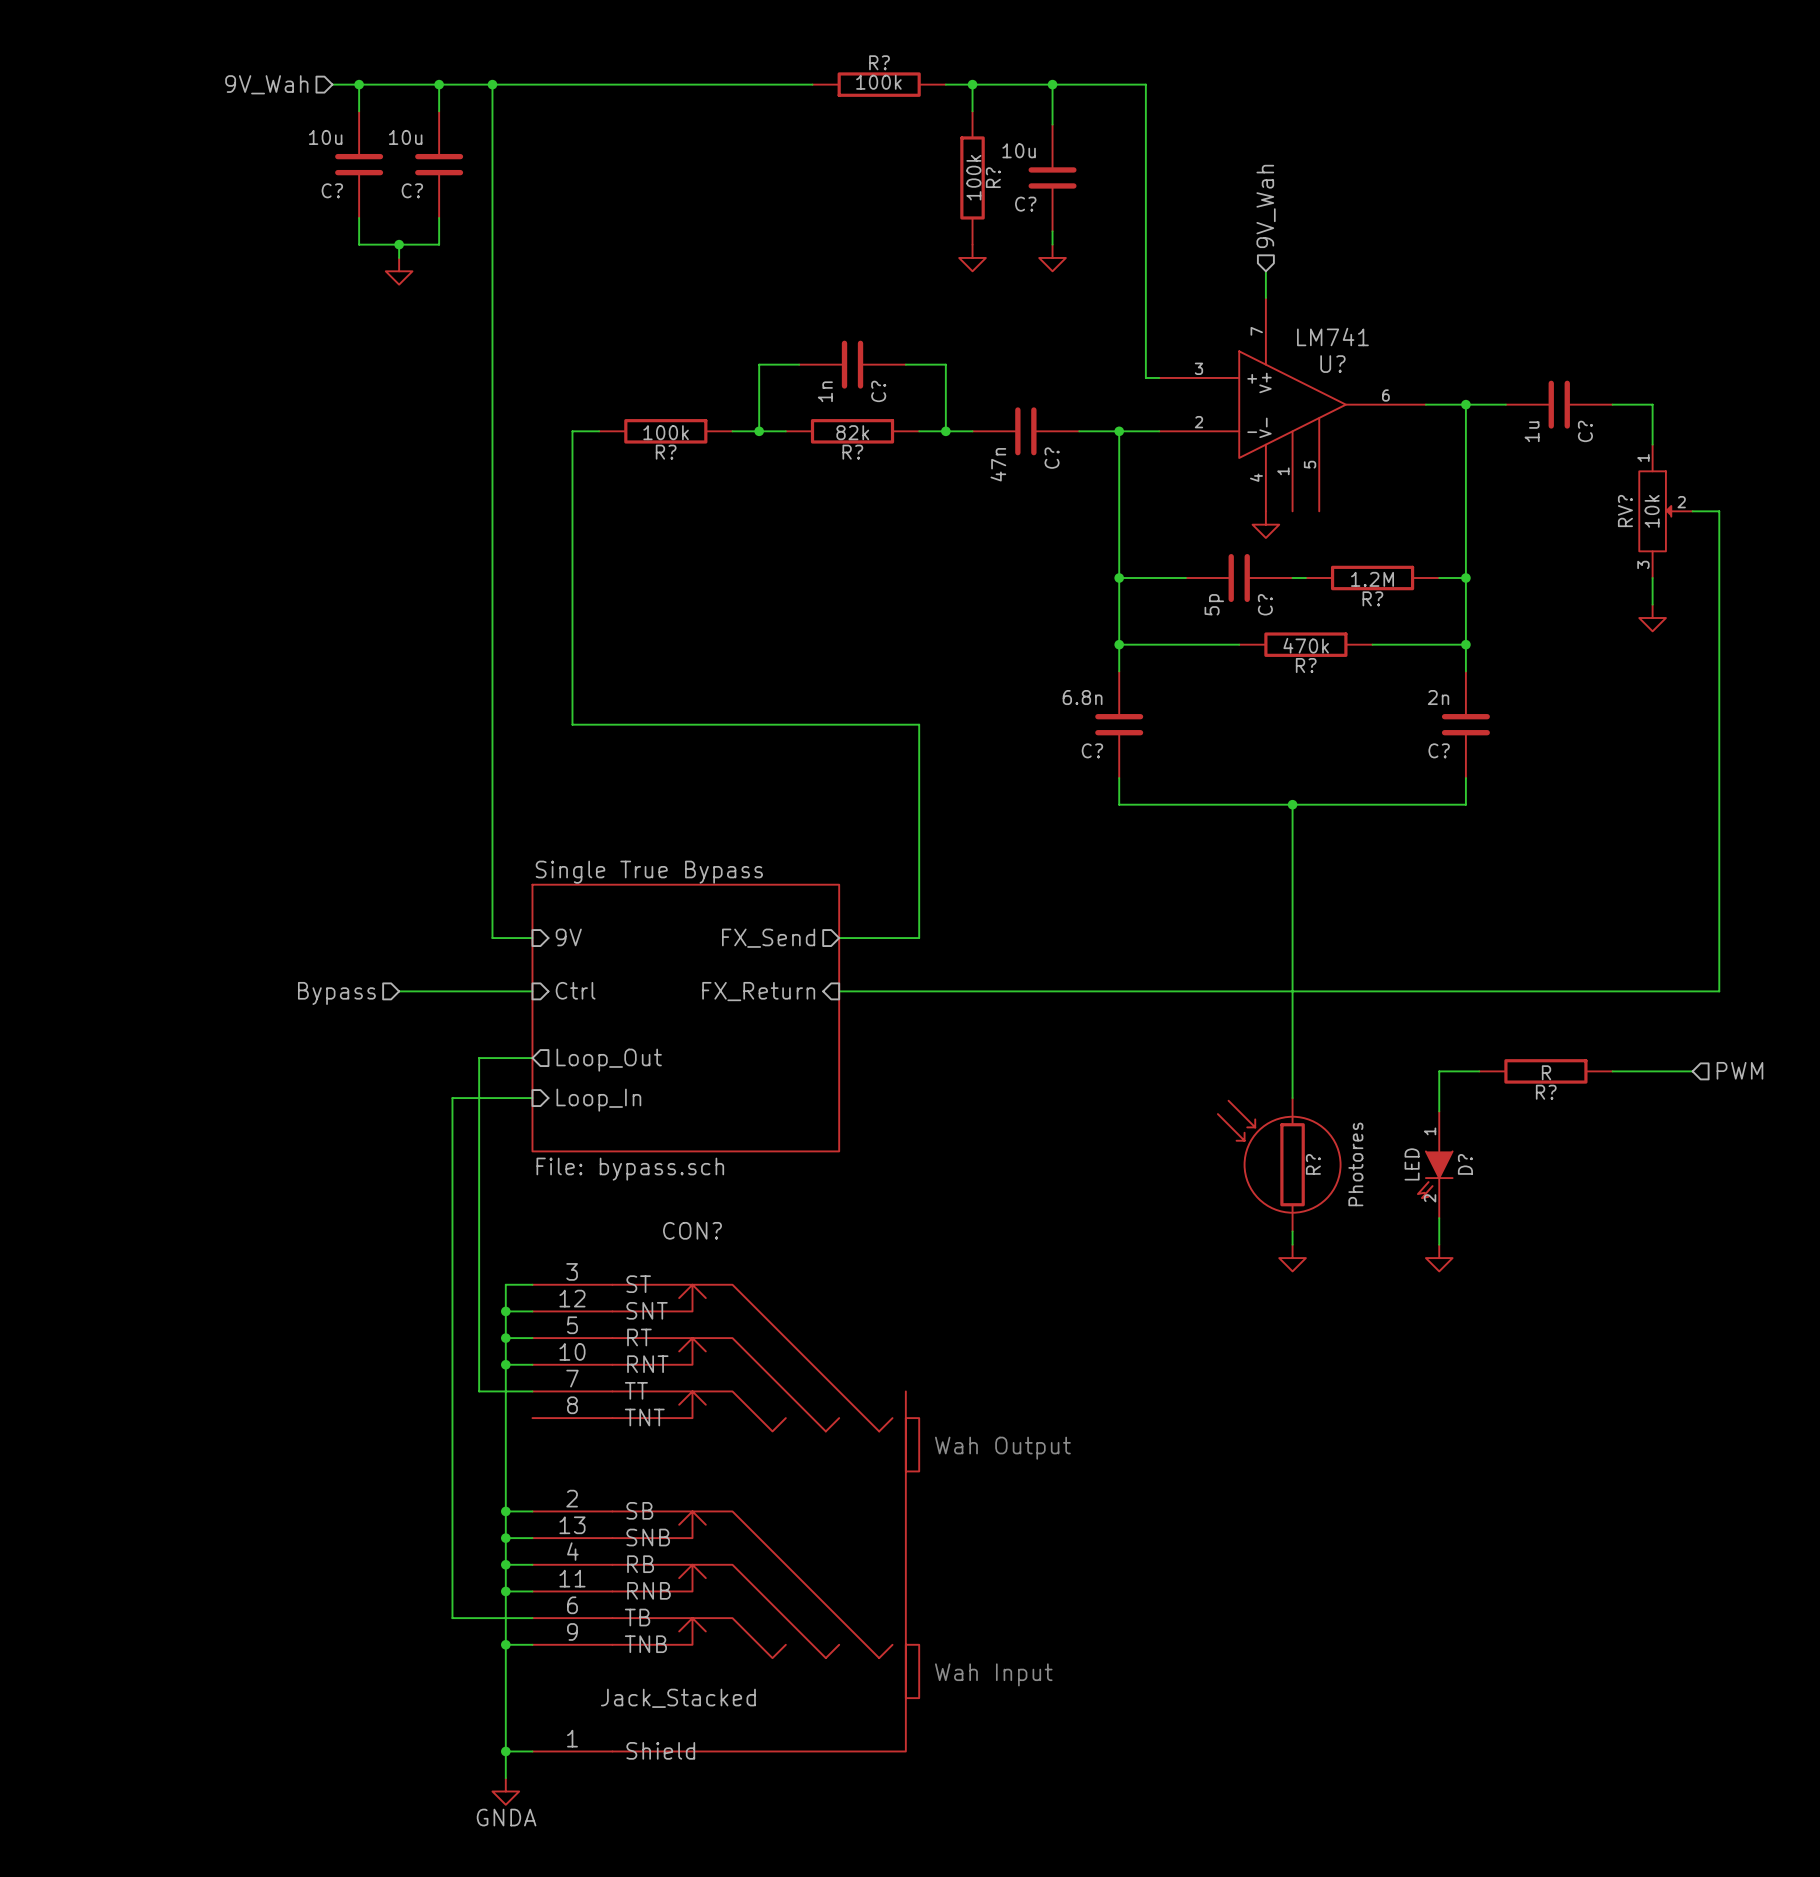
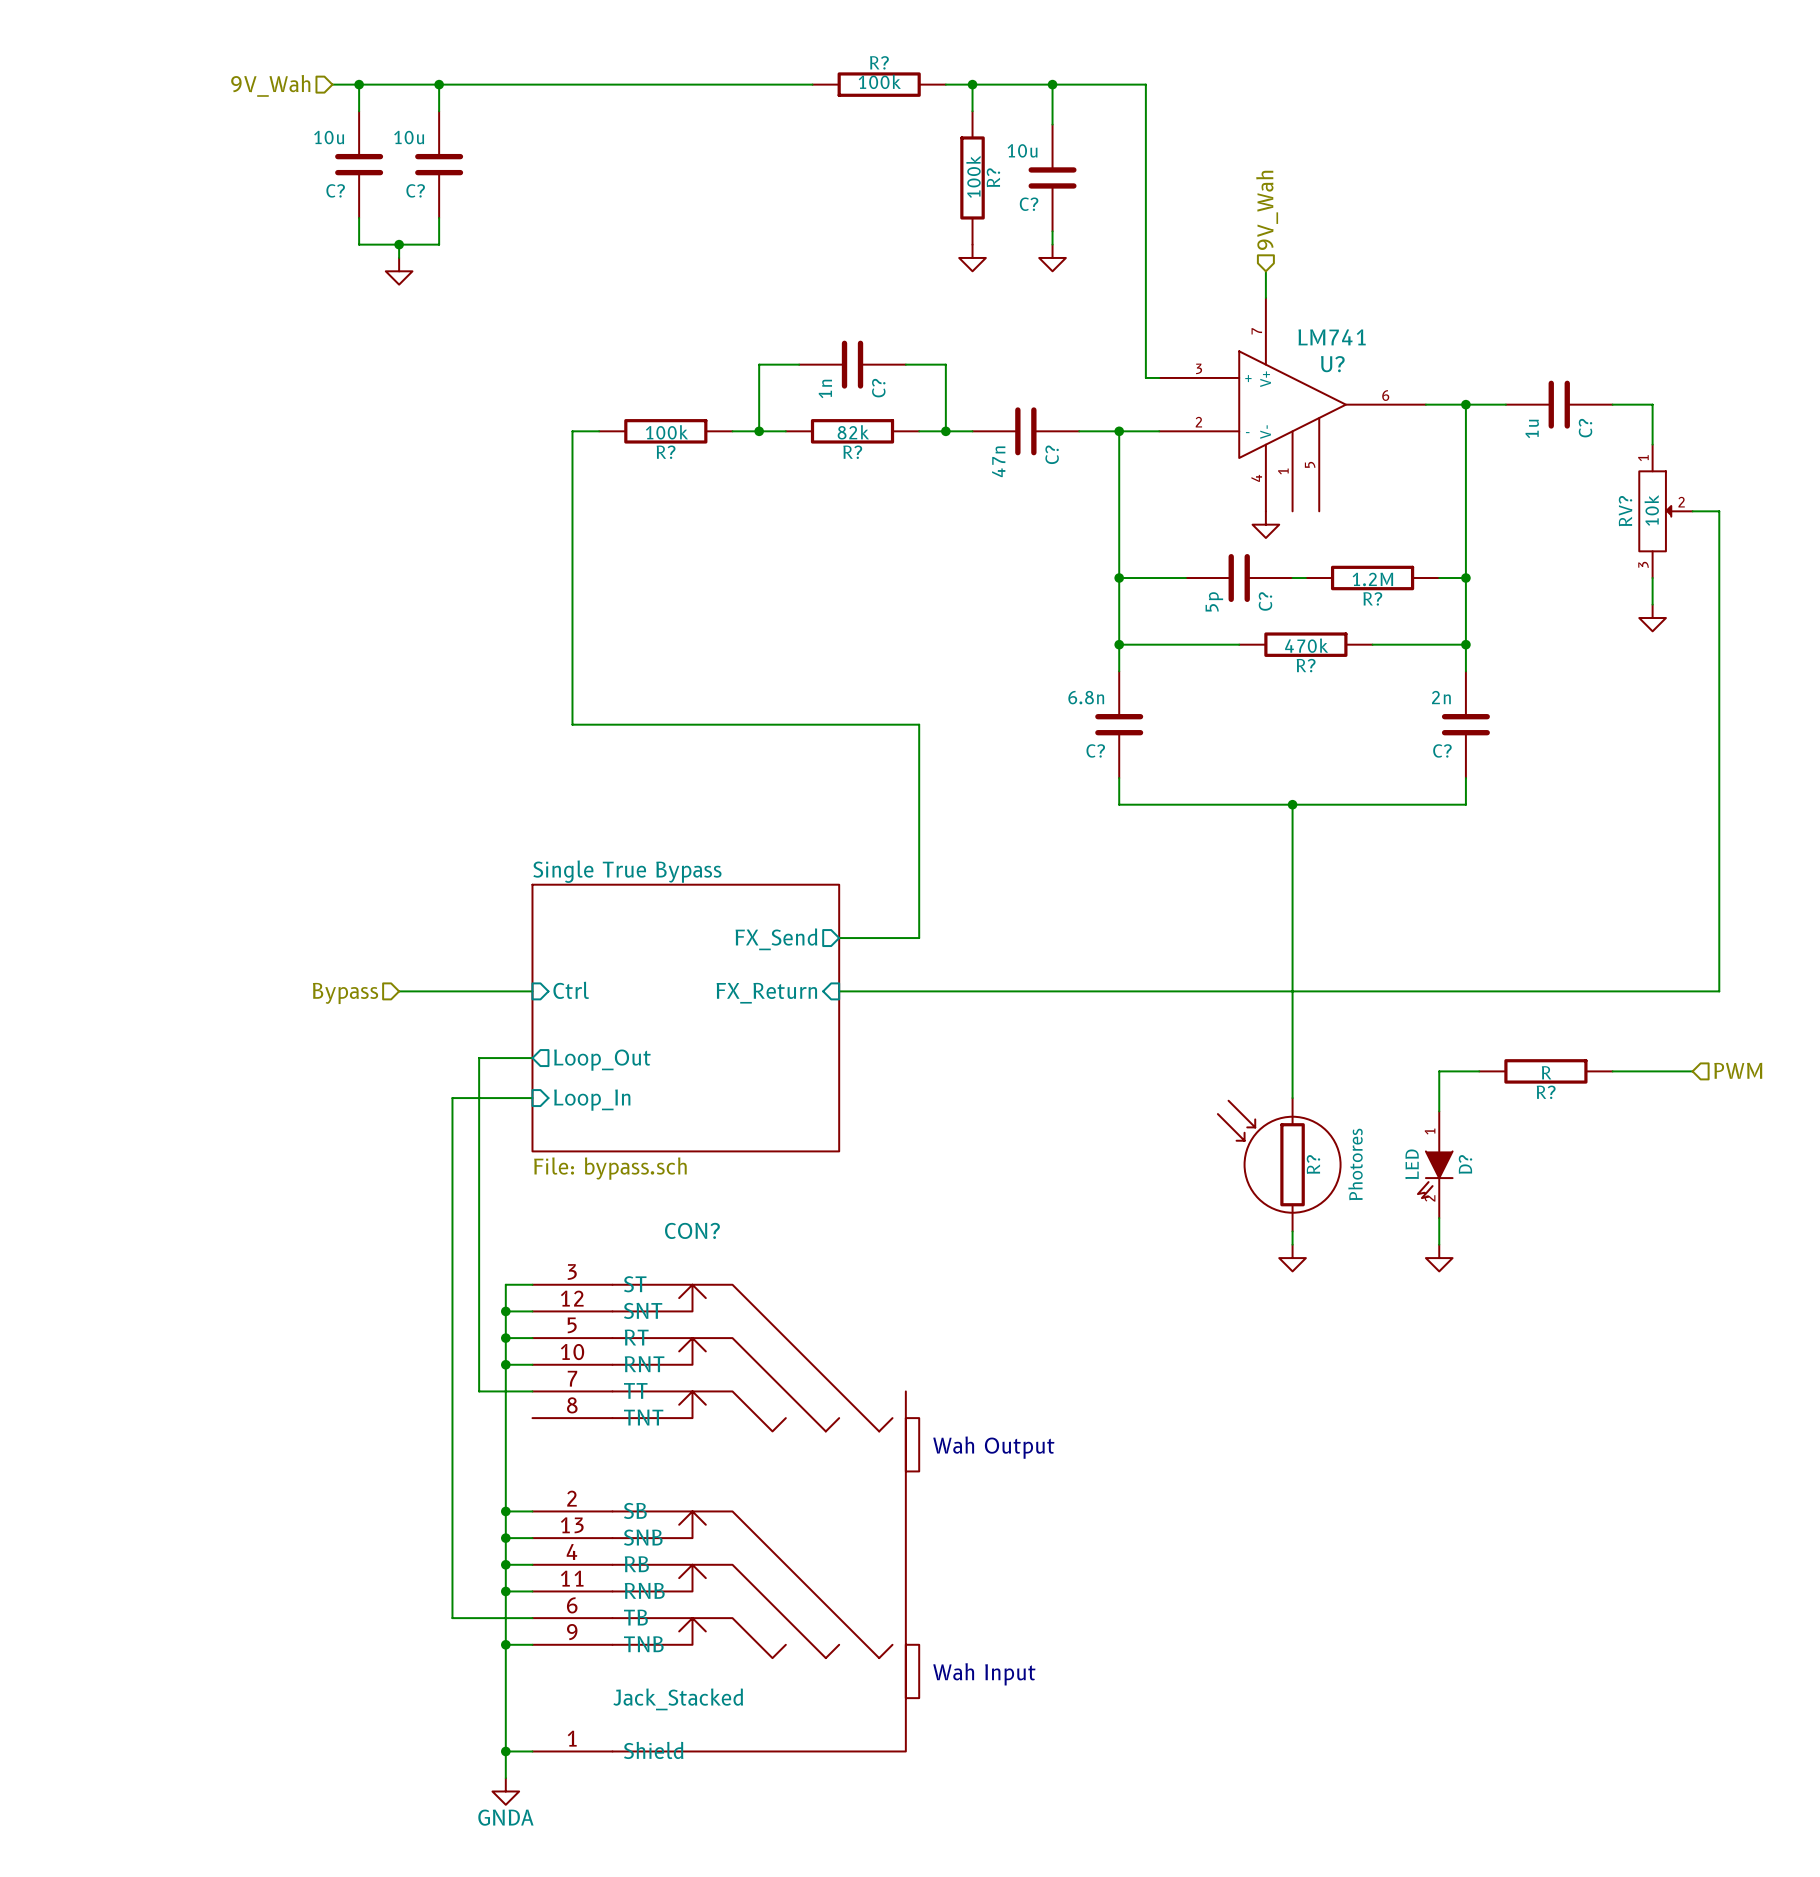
wire: (492, 84) (492, 938) (532, 938) -> none
junction: (492, 84) -> none
sheet pin: 9V (568, 937) -> none

